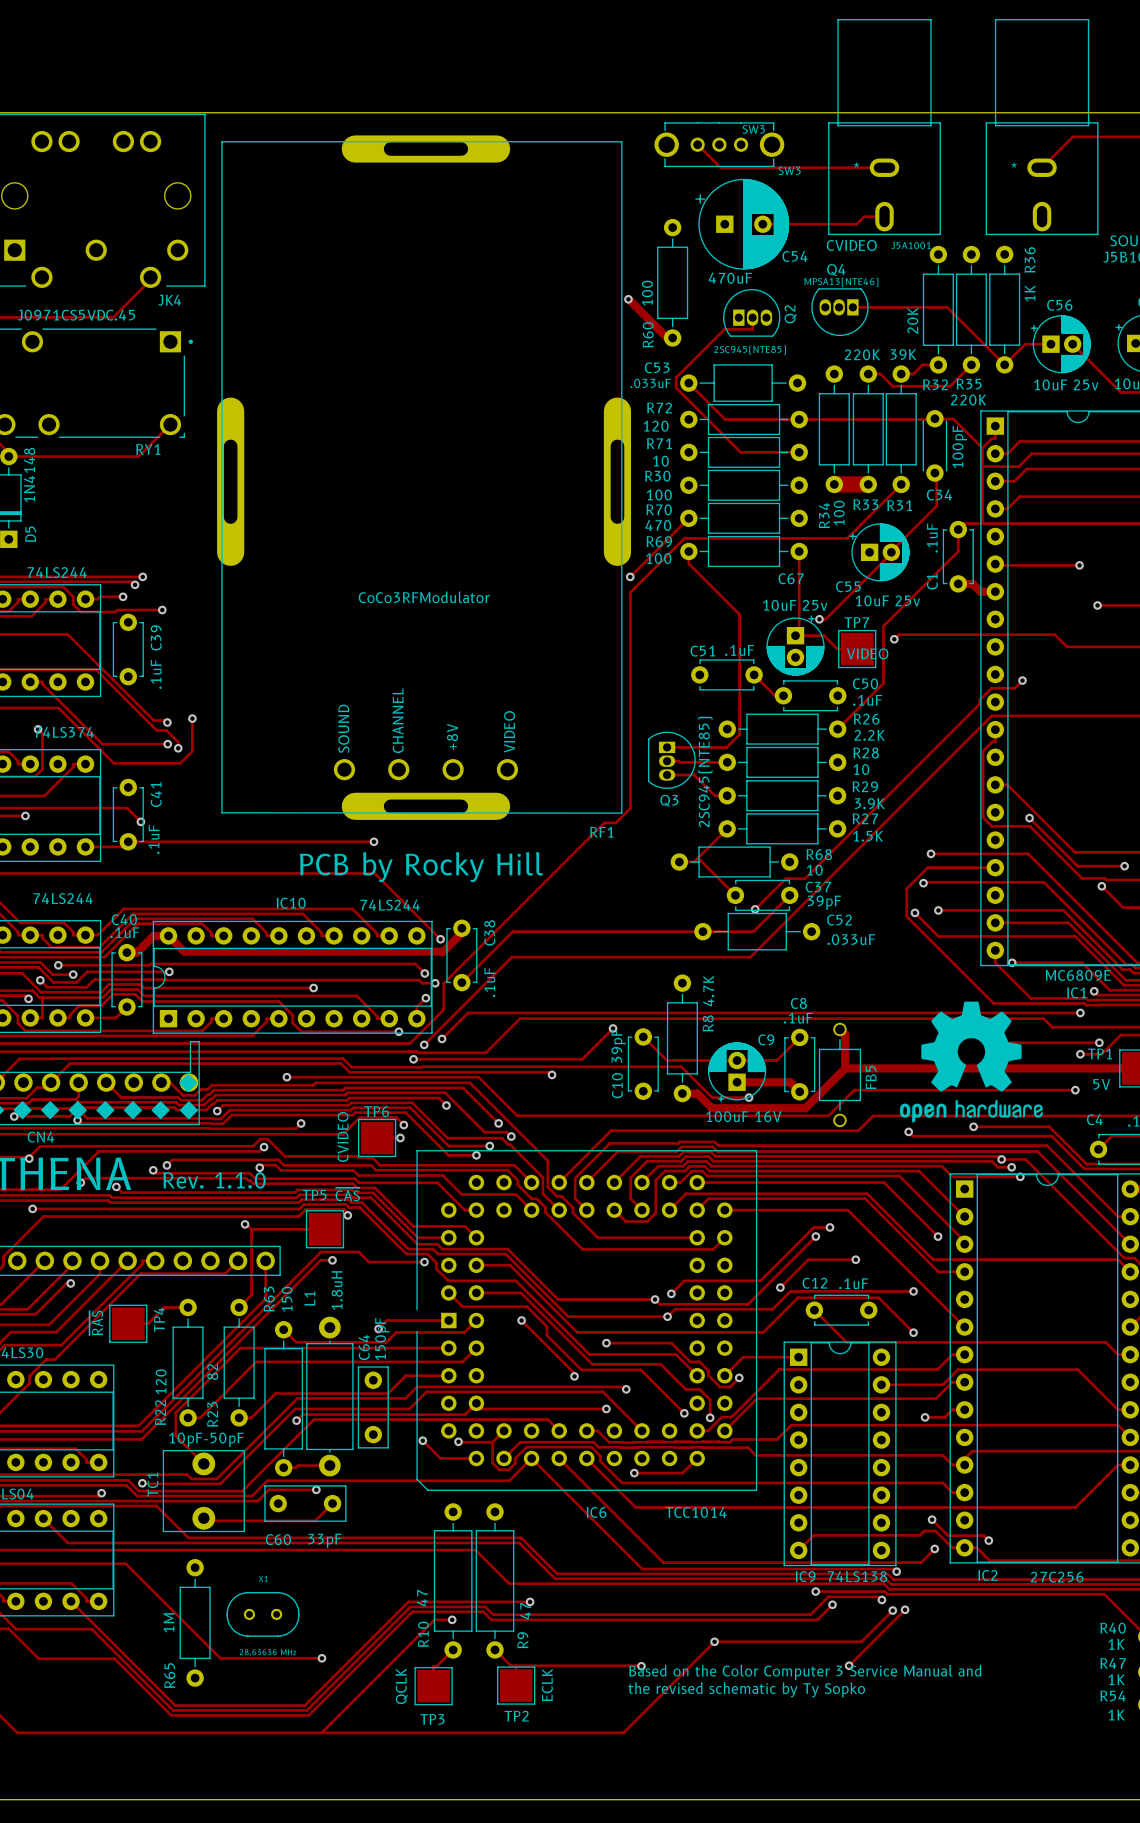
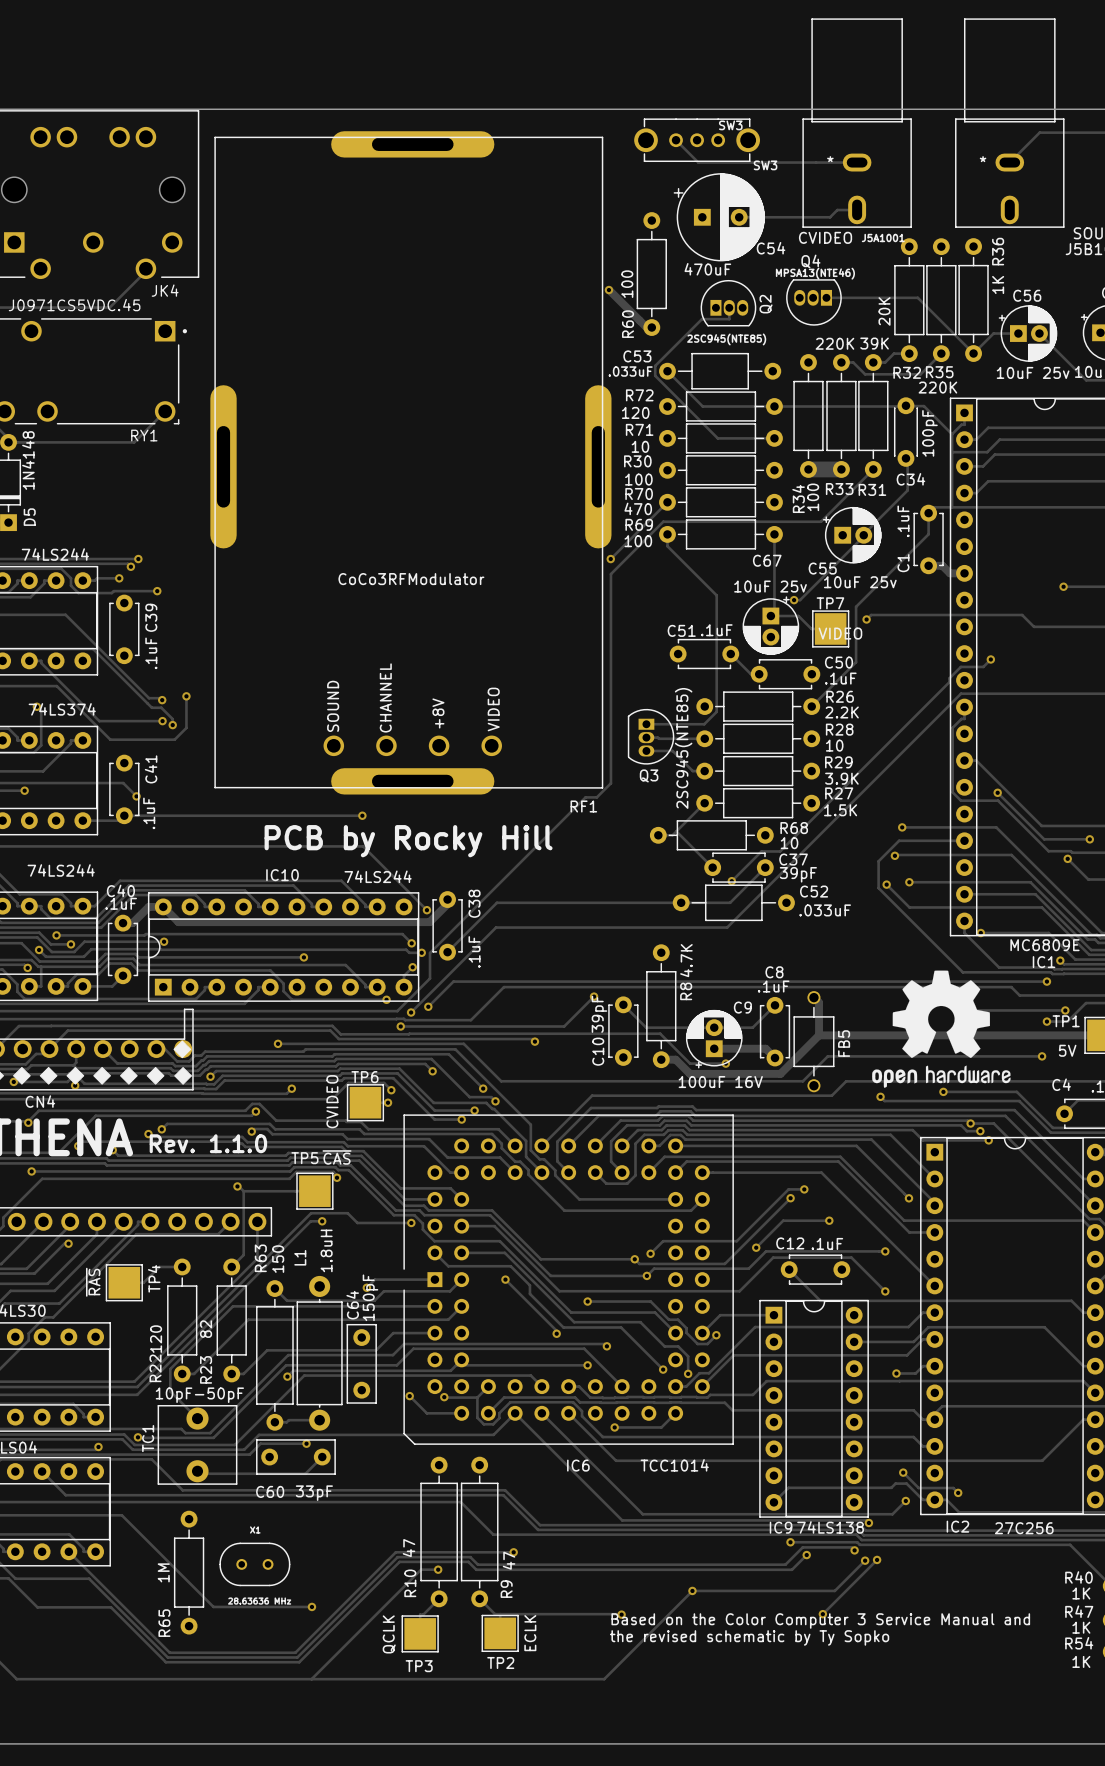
track: (995, 564) (1079, 565) -> none
via: (1079, 565) -> none

